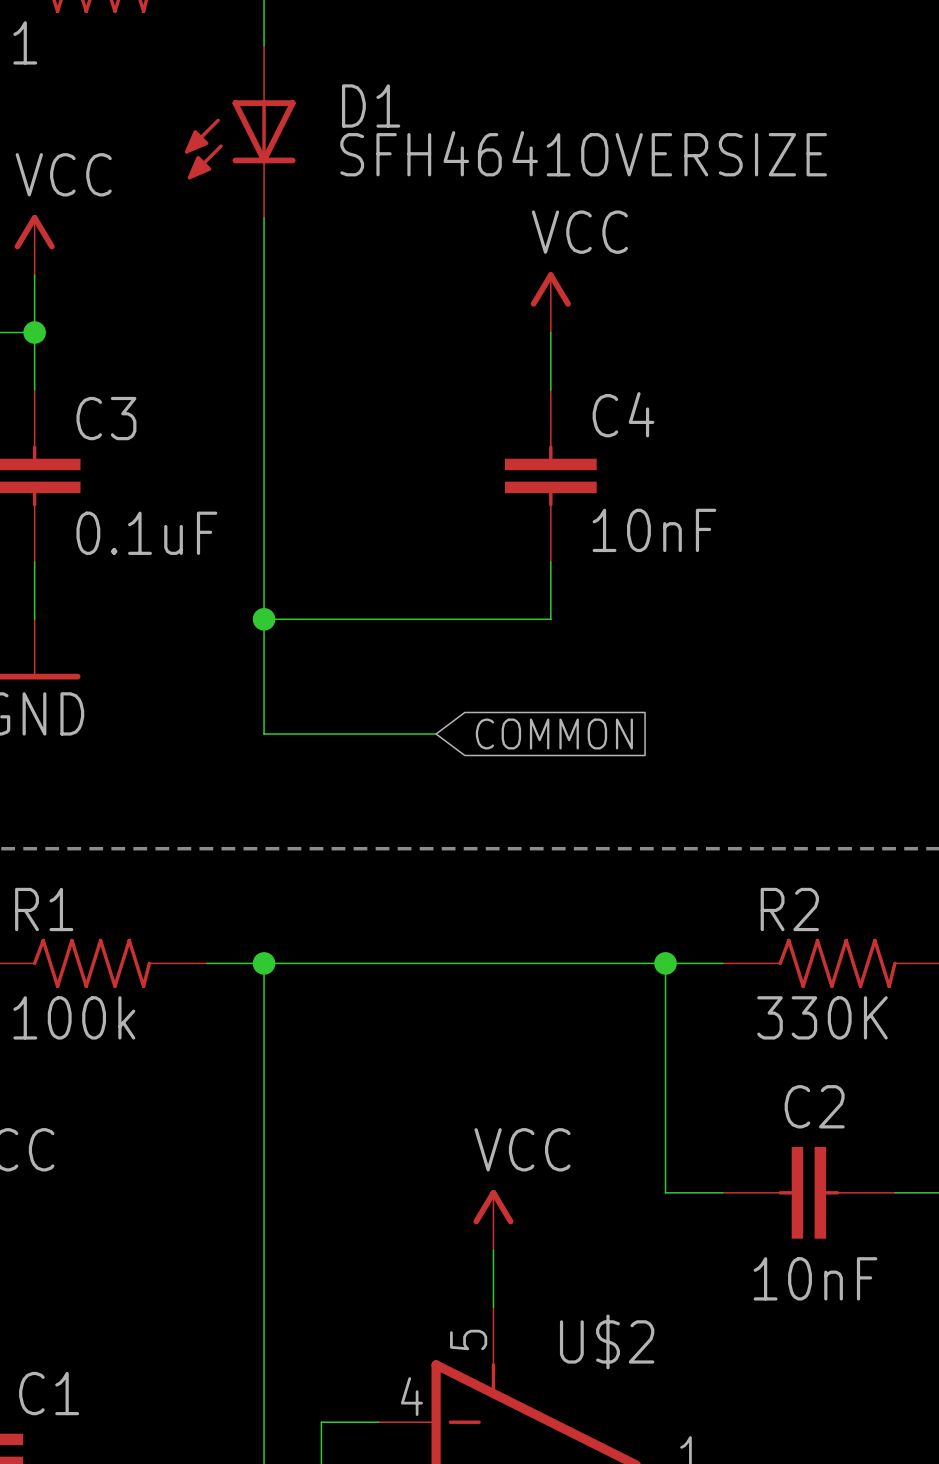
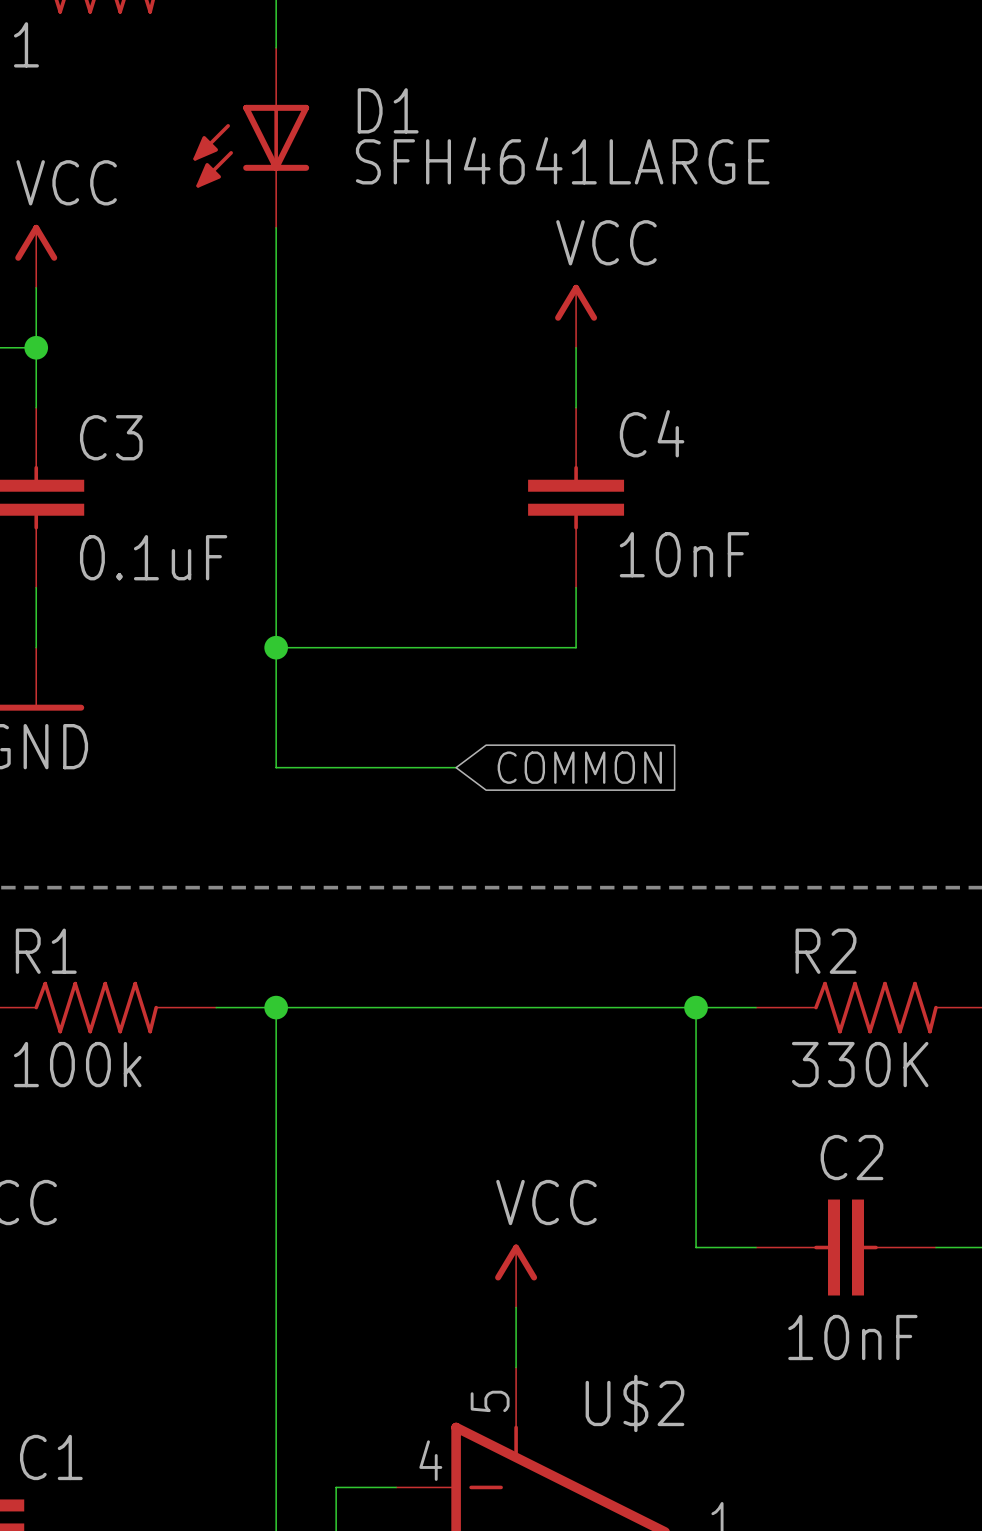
D1 value: SFH4641OVERSIZE (583, 153) -> SFH4641LARGE (562, 160)

